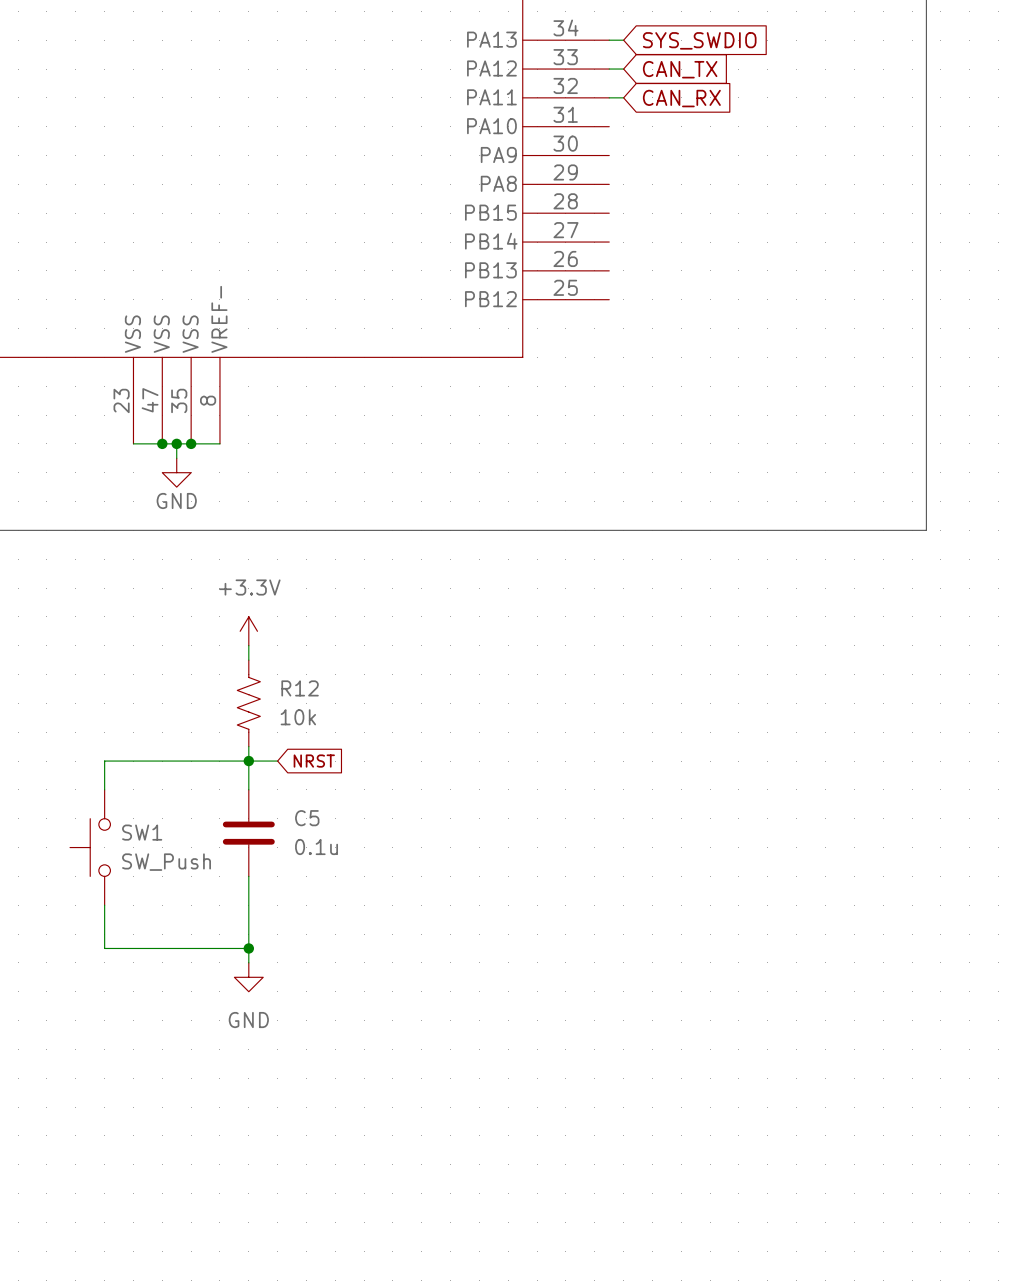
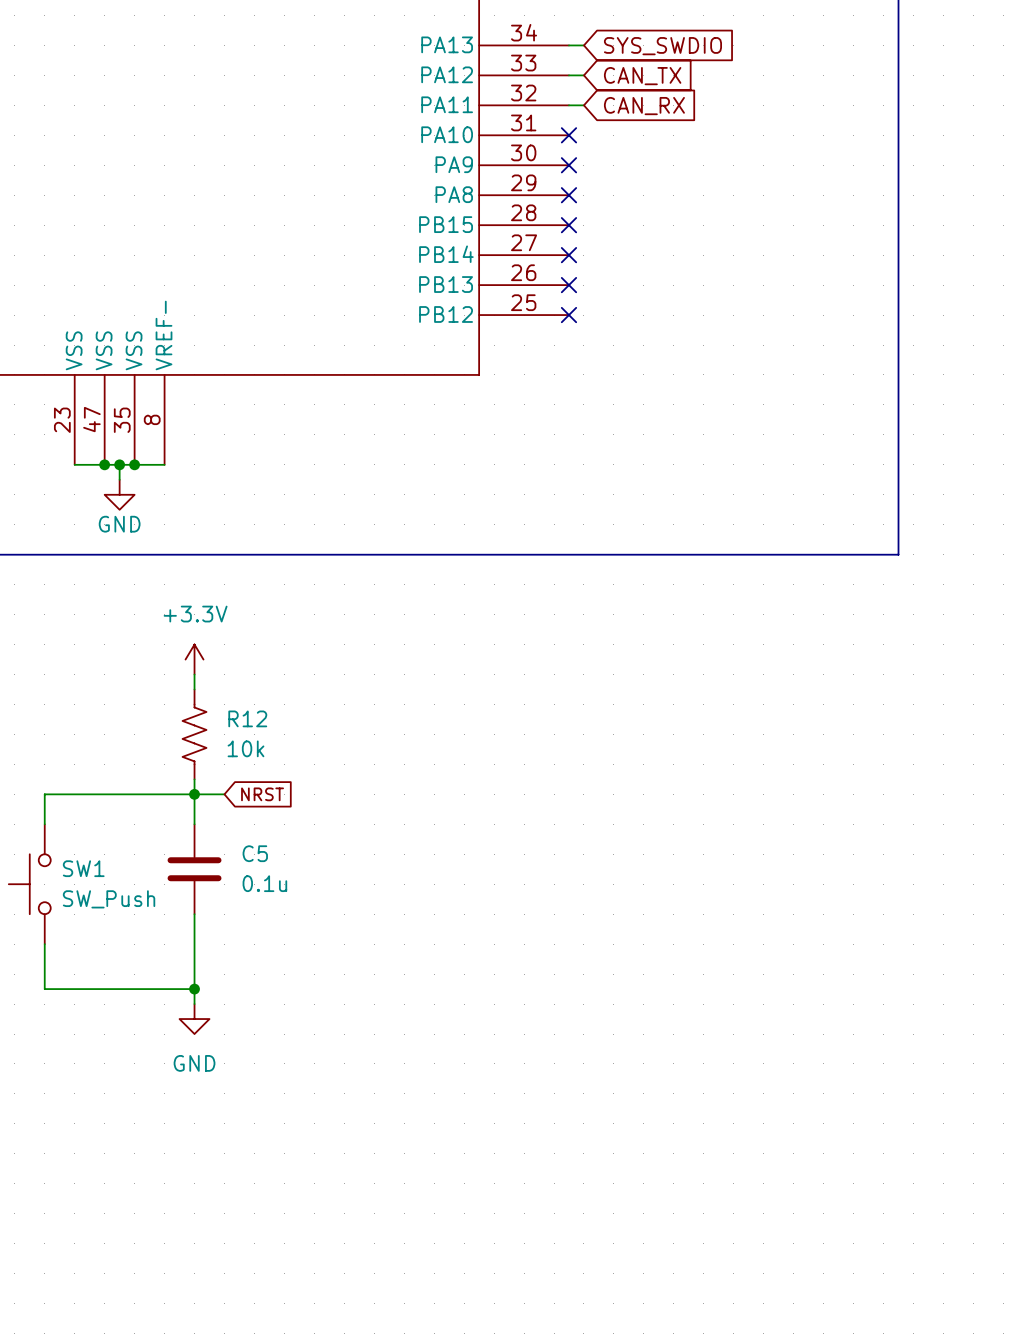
no-connect mark: none -> (568, 135)
no-connect mark: none -> (568, 165)
no-connect mark: none -> (568, 195)
no-connect mark: none -> (568, 225)
no-connect mark: none -> (568, 255)
no-connect mark: none -> (568, 285)
no-connect mark: none -> (568, 315)

